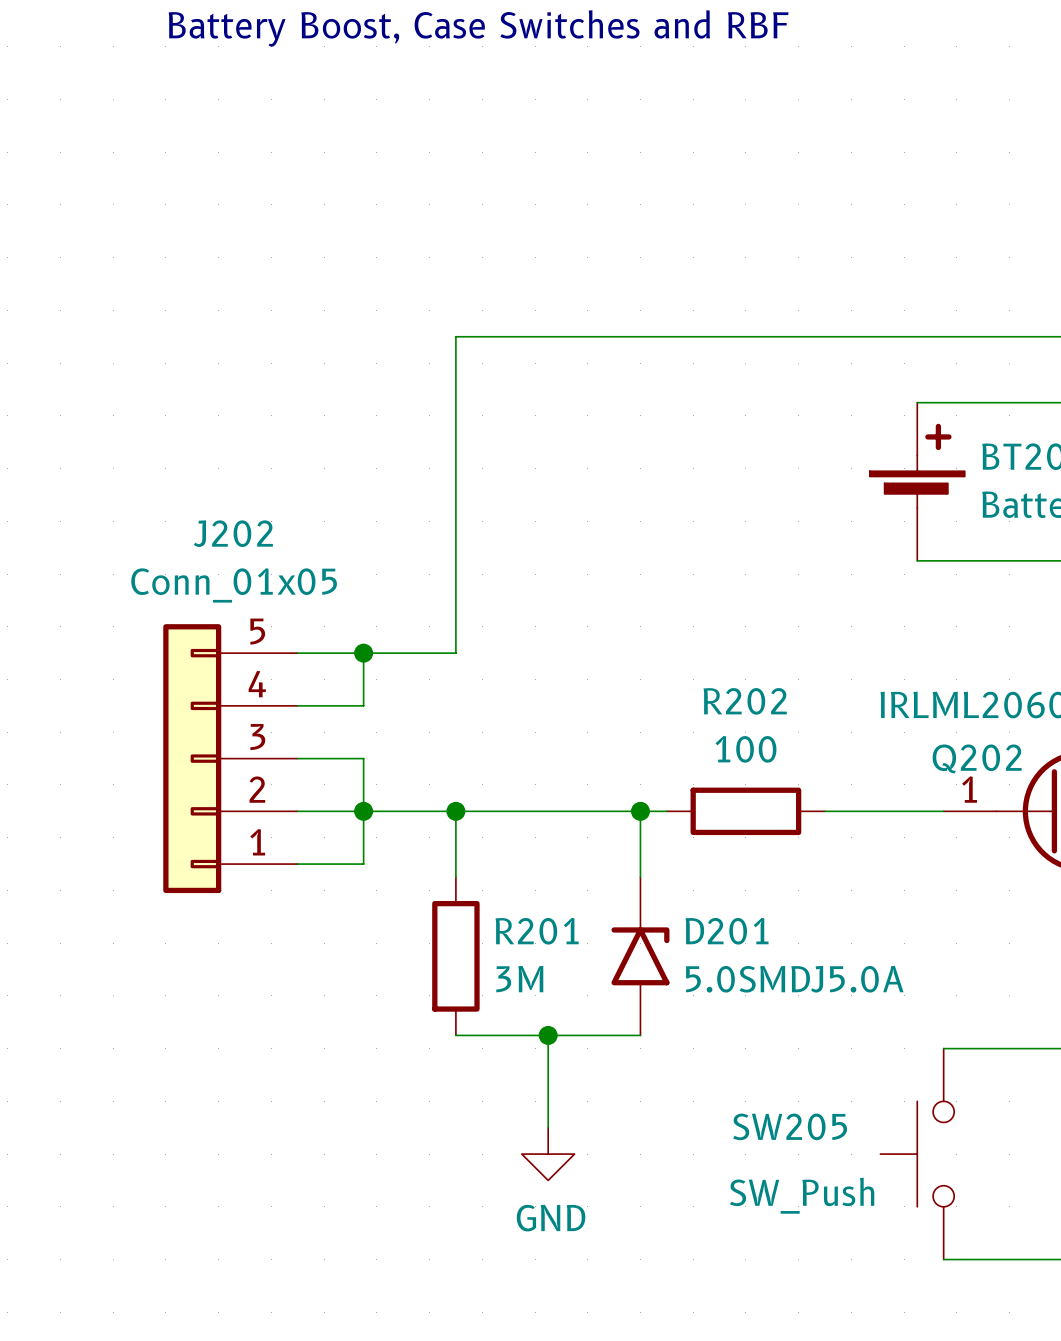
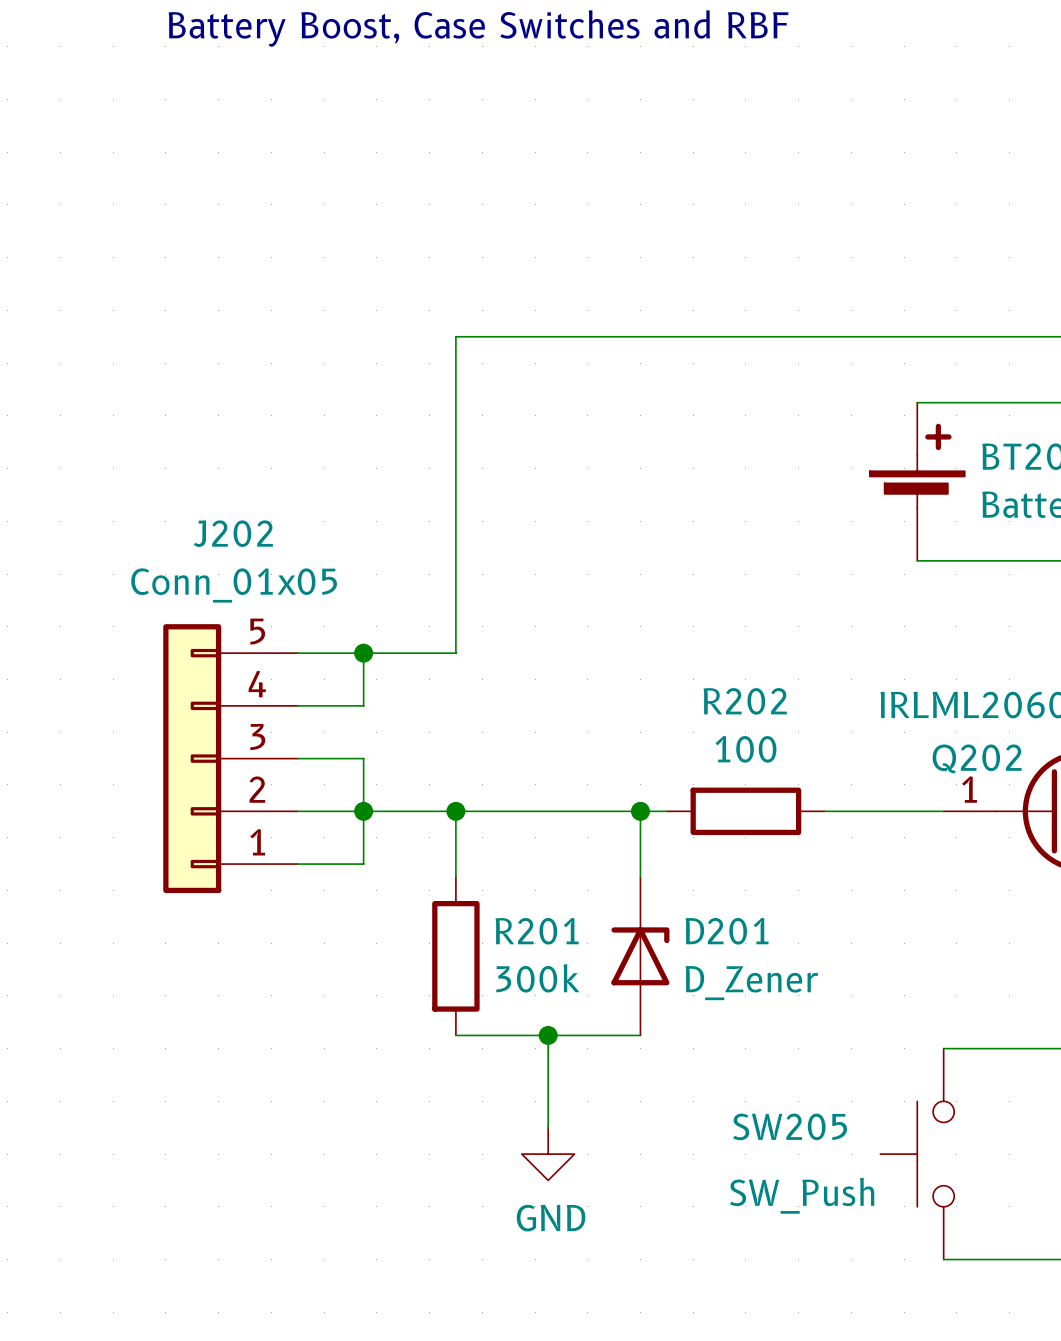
D201 symbol: [611, 877, 670, 1036] -> [611, 877, 670, 1036]
R201 value: 3M (519, 979) -> 300k (537, 978)
D201 value: 5.0SMDJ5.0A (794, 979) -> D_Zener (751, 983)

